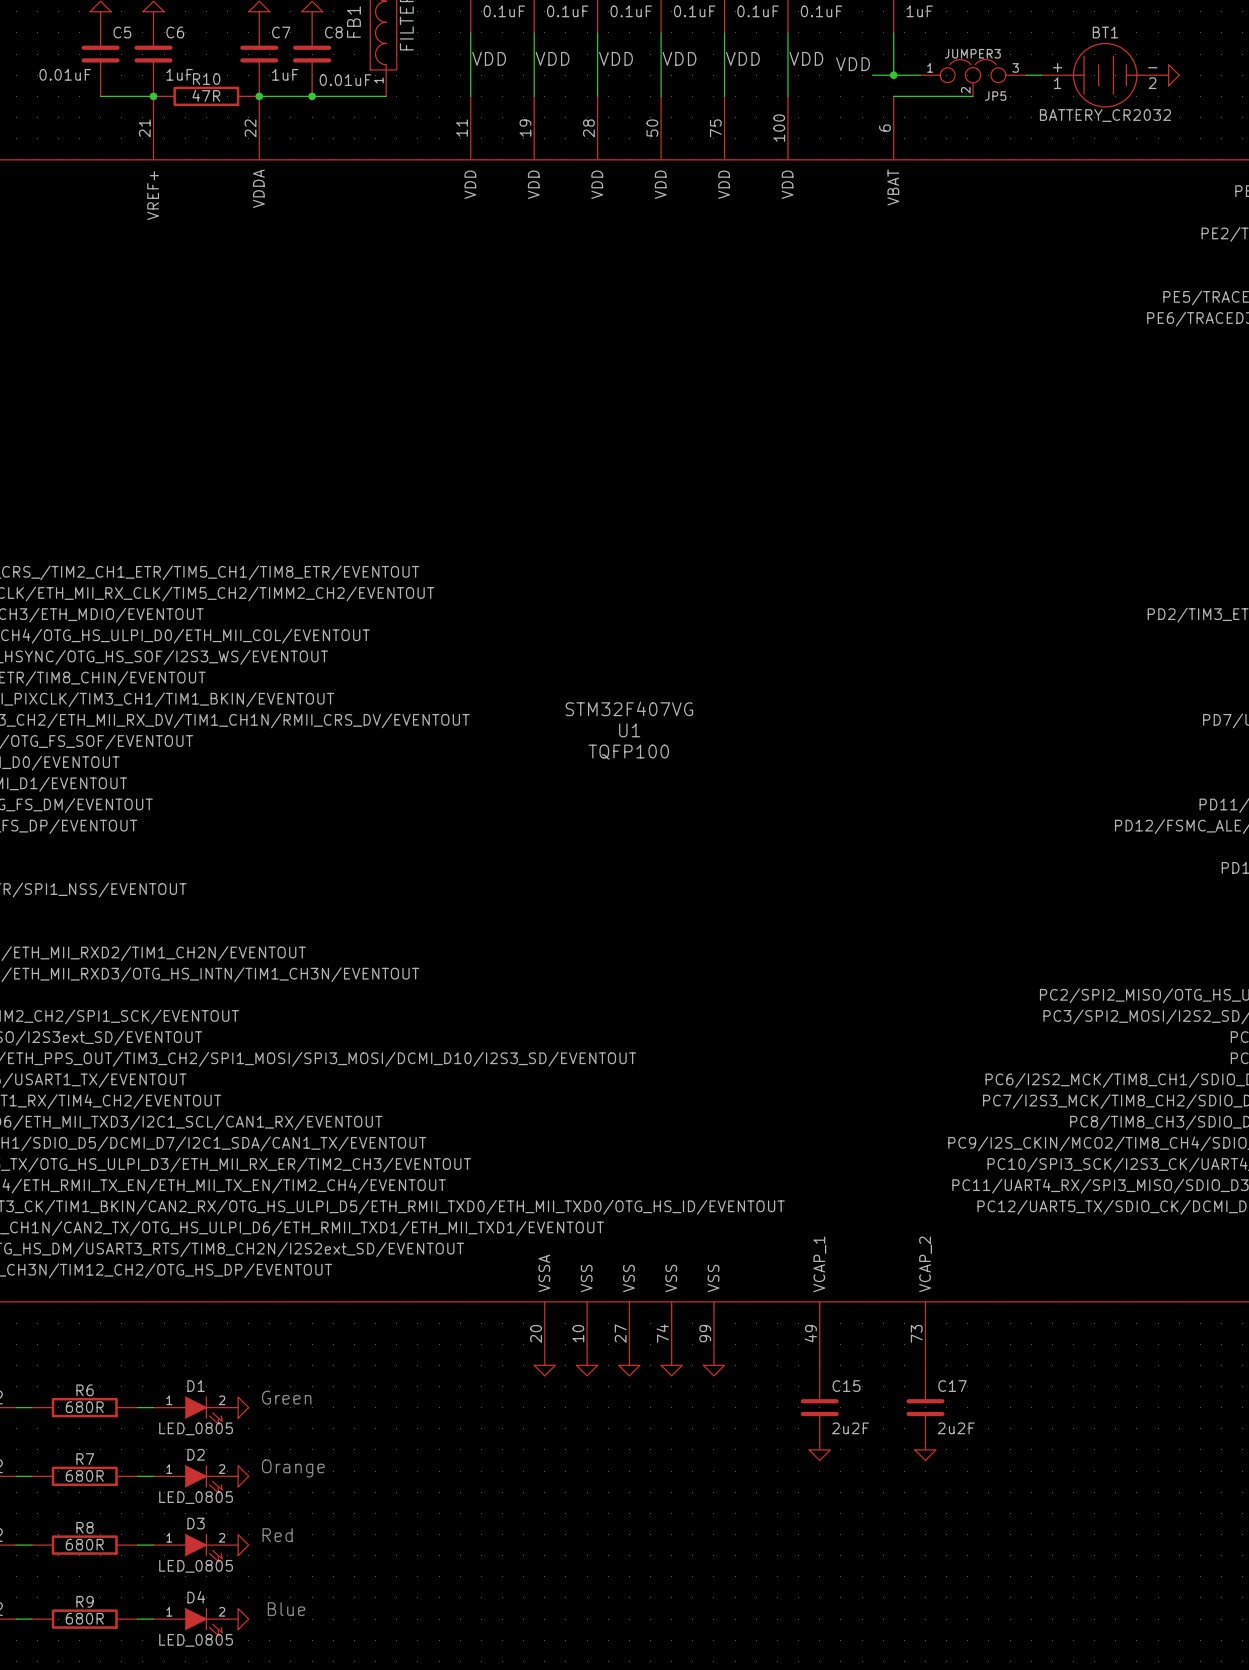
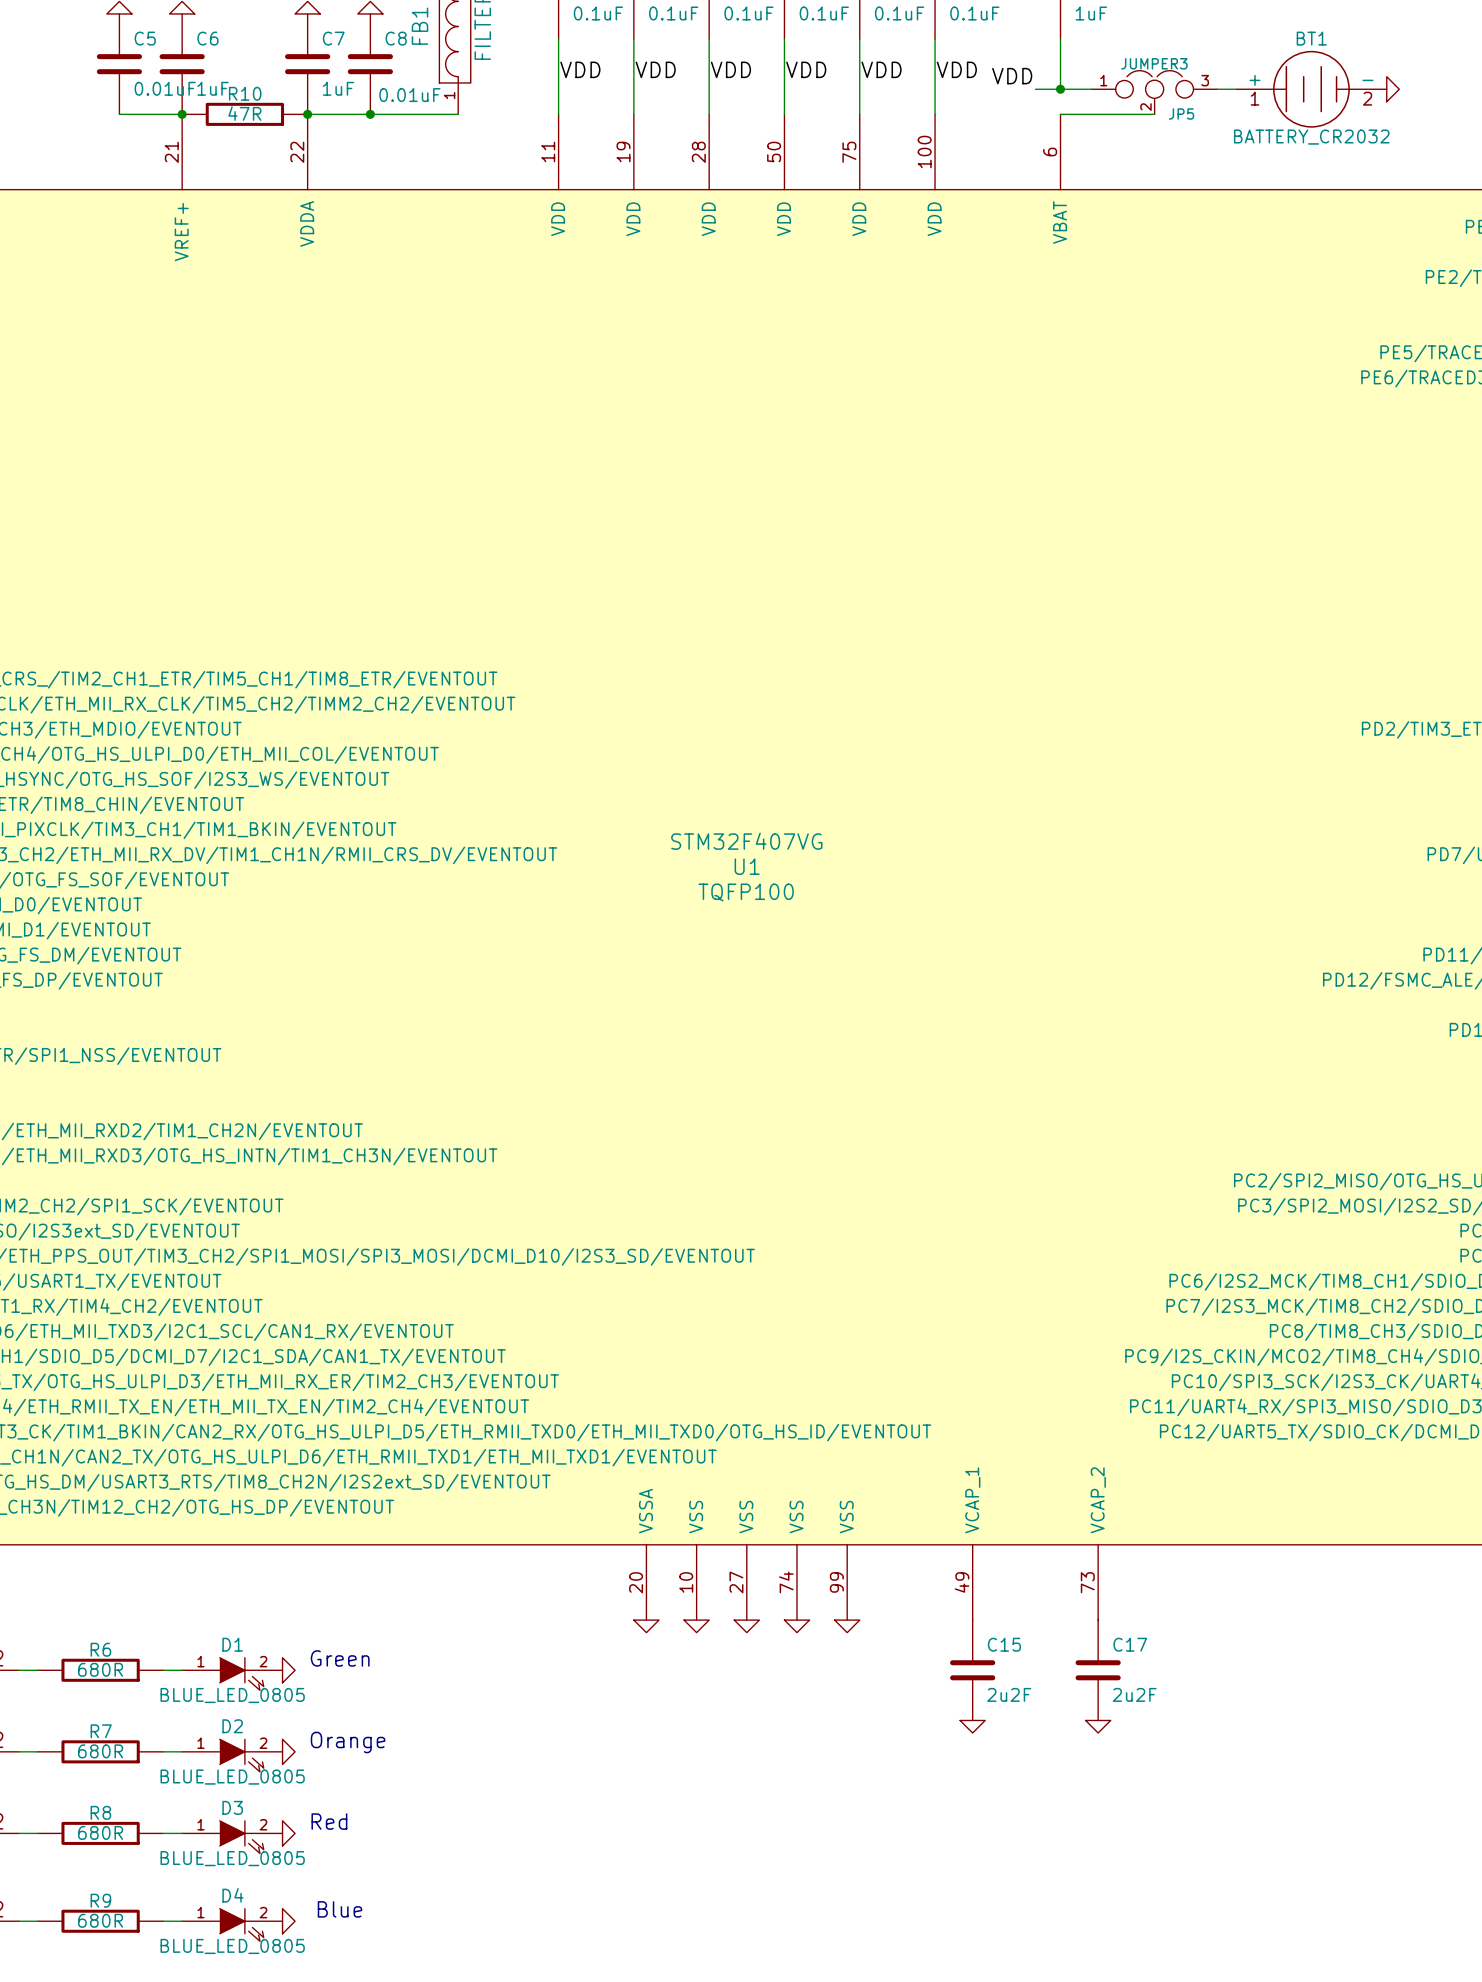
C5 value position: 0.01uF (65, 74) -> 0.01uF (165, 88)
D1 value: LED_0805 (196, 1428) -> BLUE_LED_0805 (232, 1695)
D2 value: LED_0805 (196, 1497) -> BLUE_LED_0805 (232, 1777)
D3 value: LED_0805 (196, 1566) -> BLUE_LED_0805 (232, 1858)
D4 value: LED_0805 (196, 1640) -> BLUE_LED_0805 (232, 1946)

